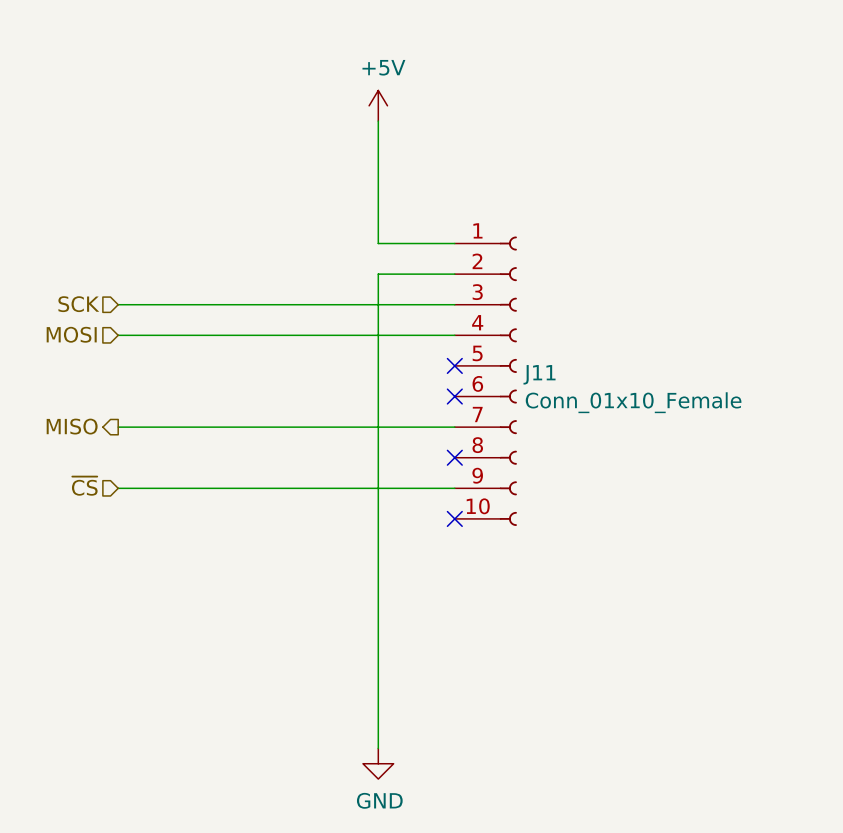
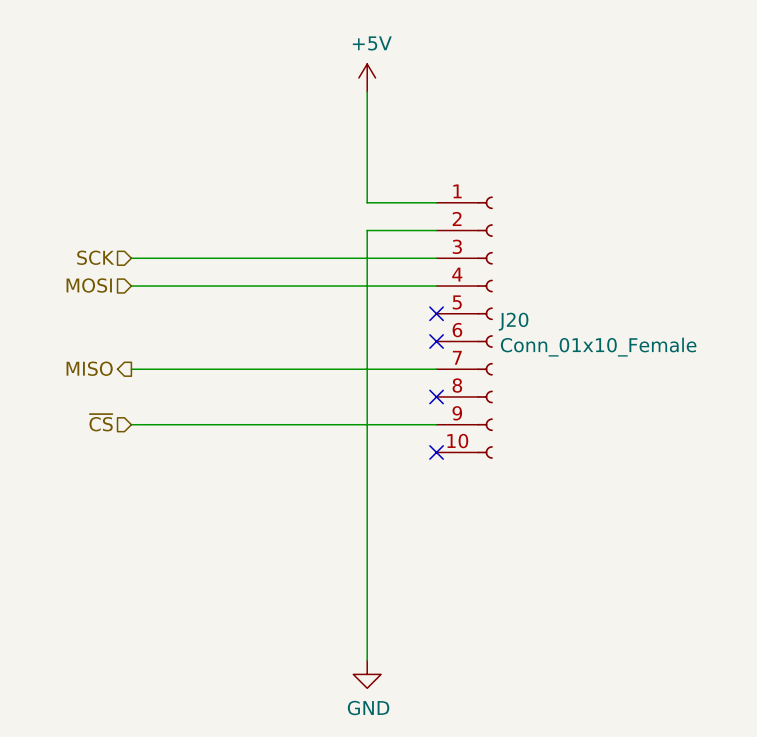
J11 name: J11 (539, 374) -> J20 (513, 321)

